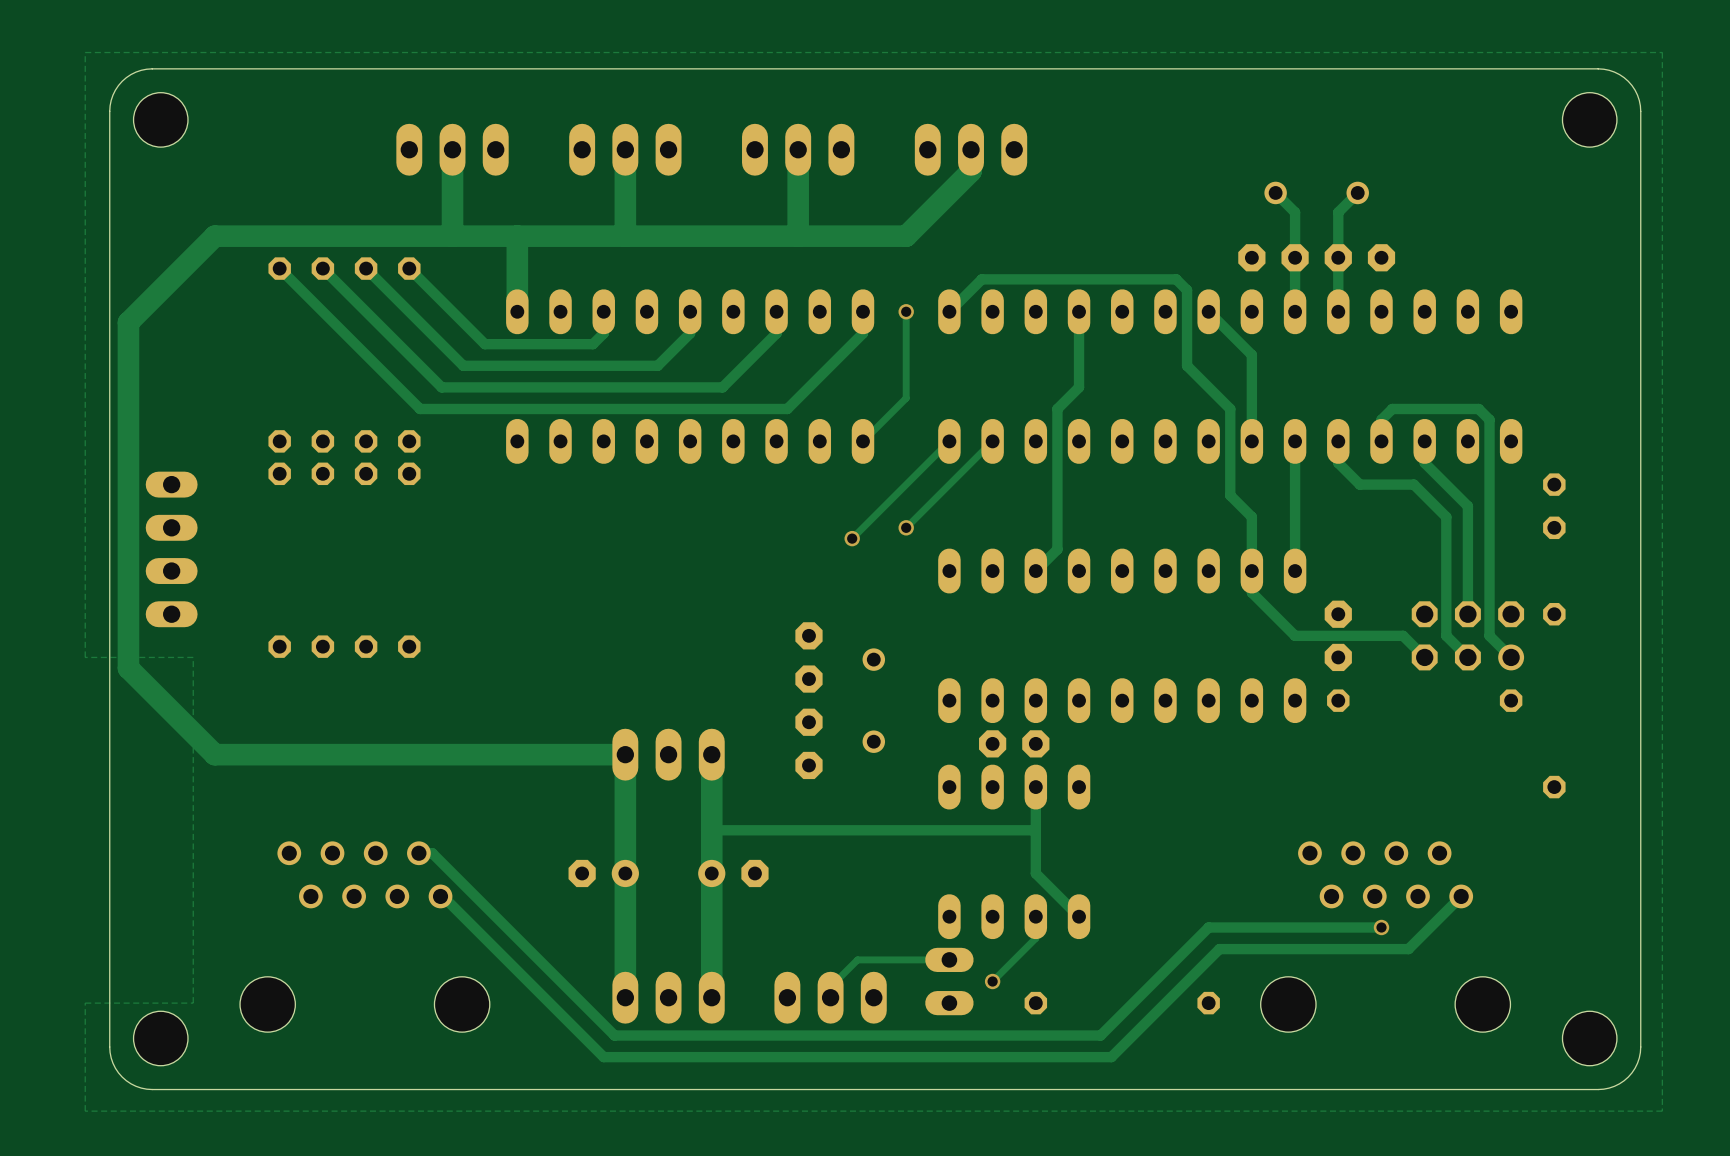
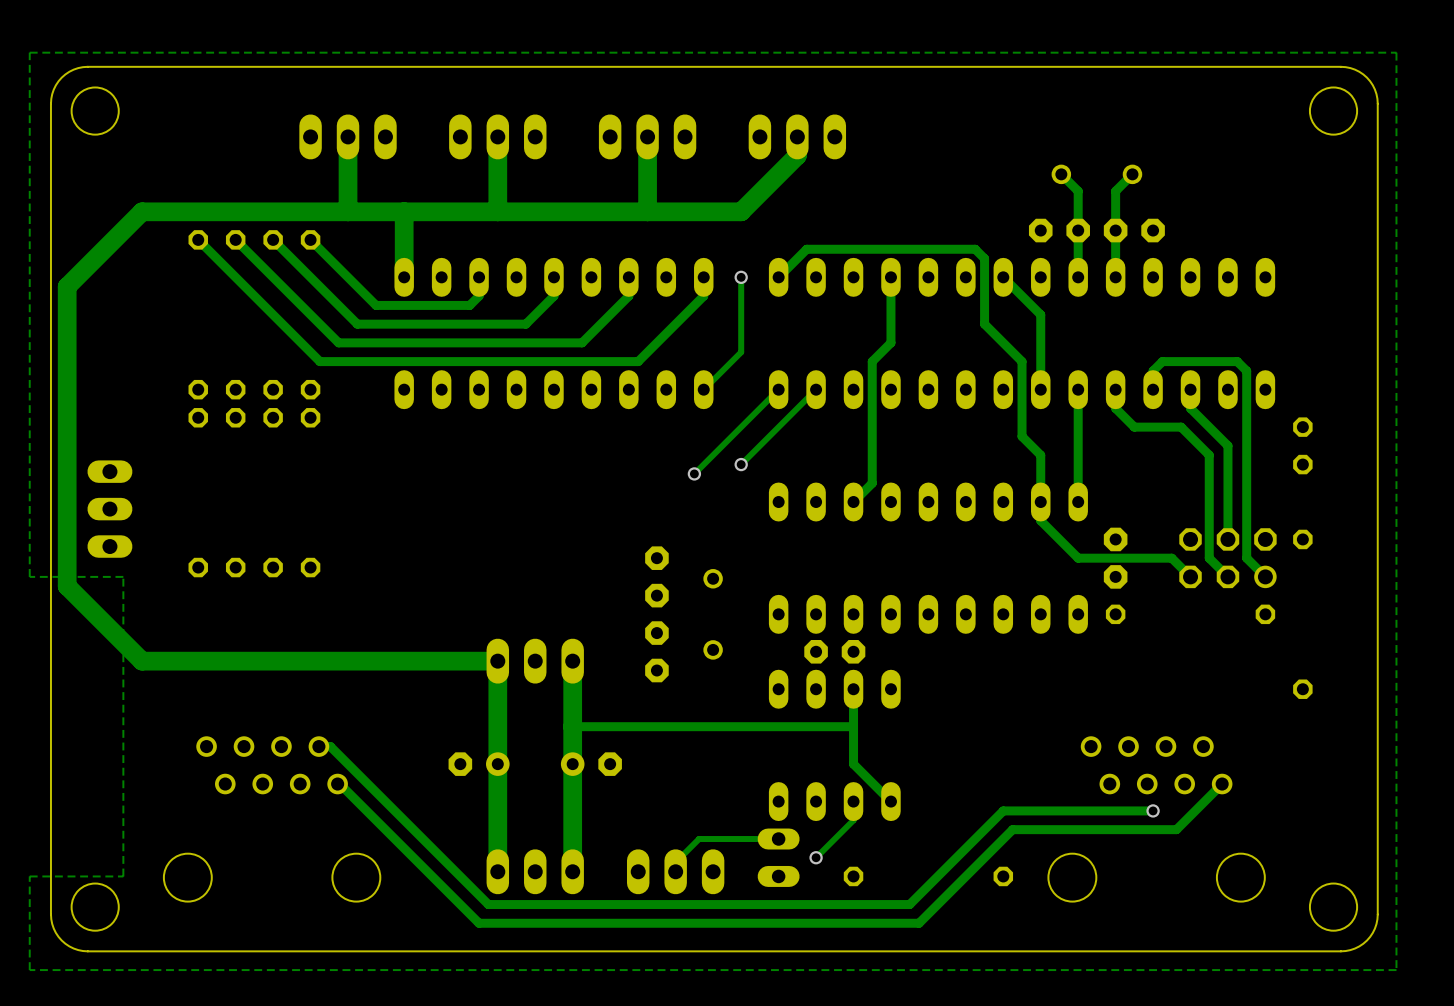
part: (171, 549) -> none
part: none -> (109, 509)

